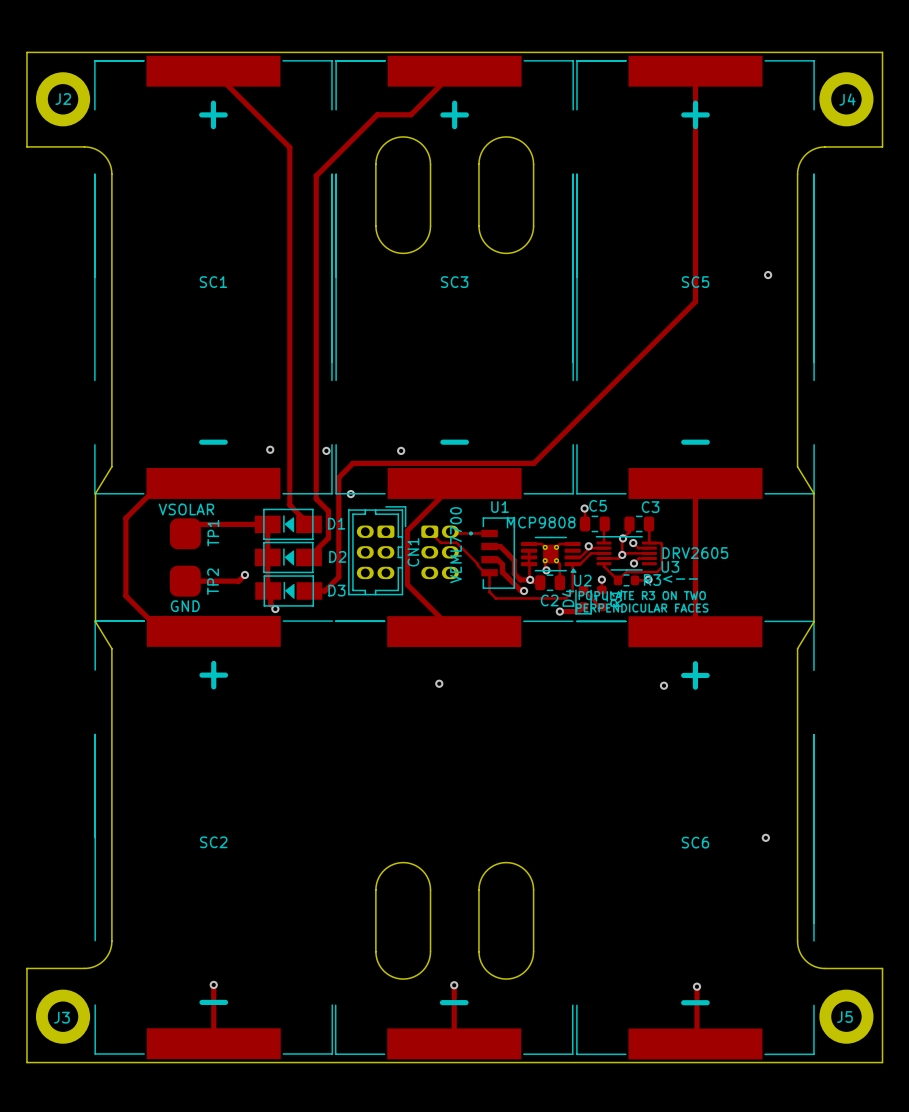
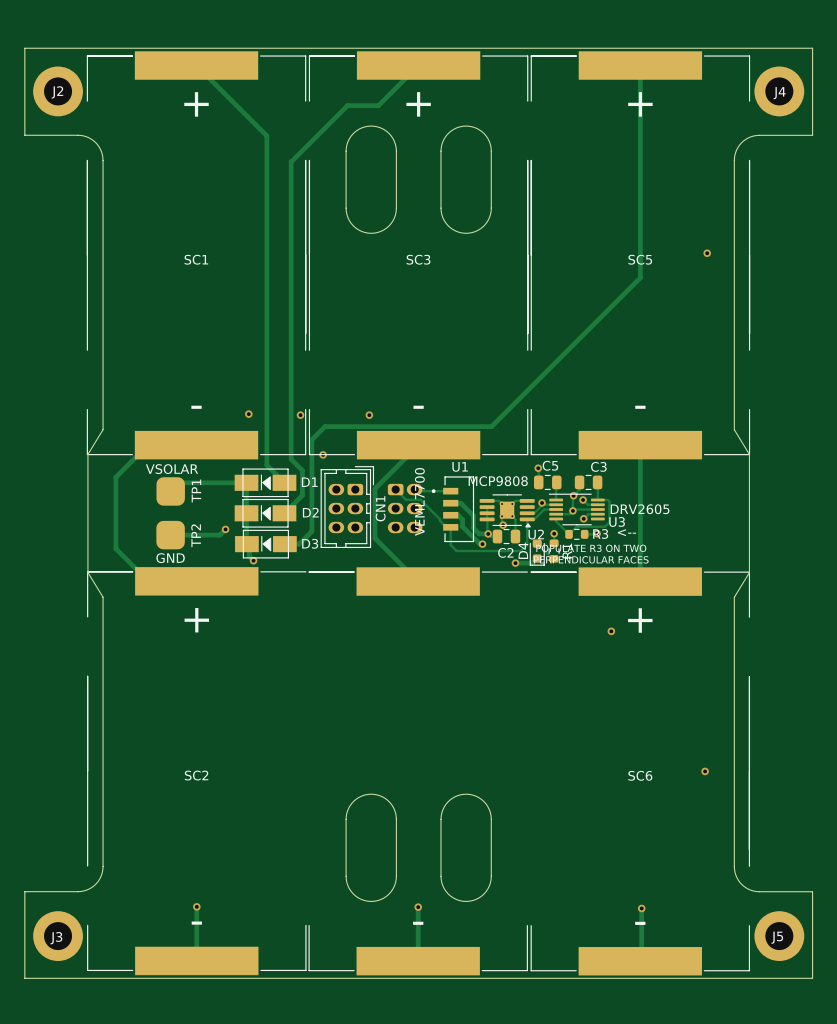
via: (439, 683) -> none

